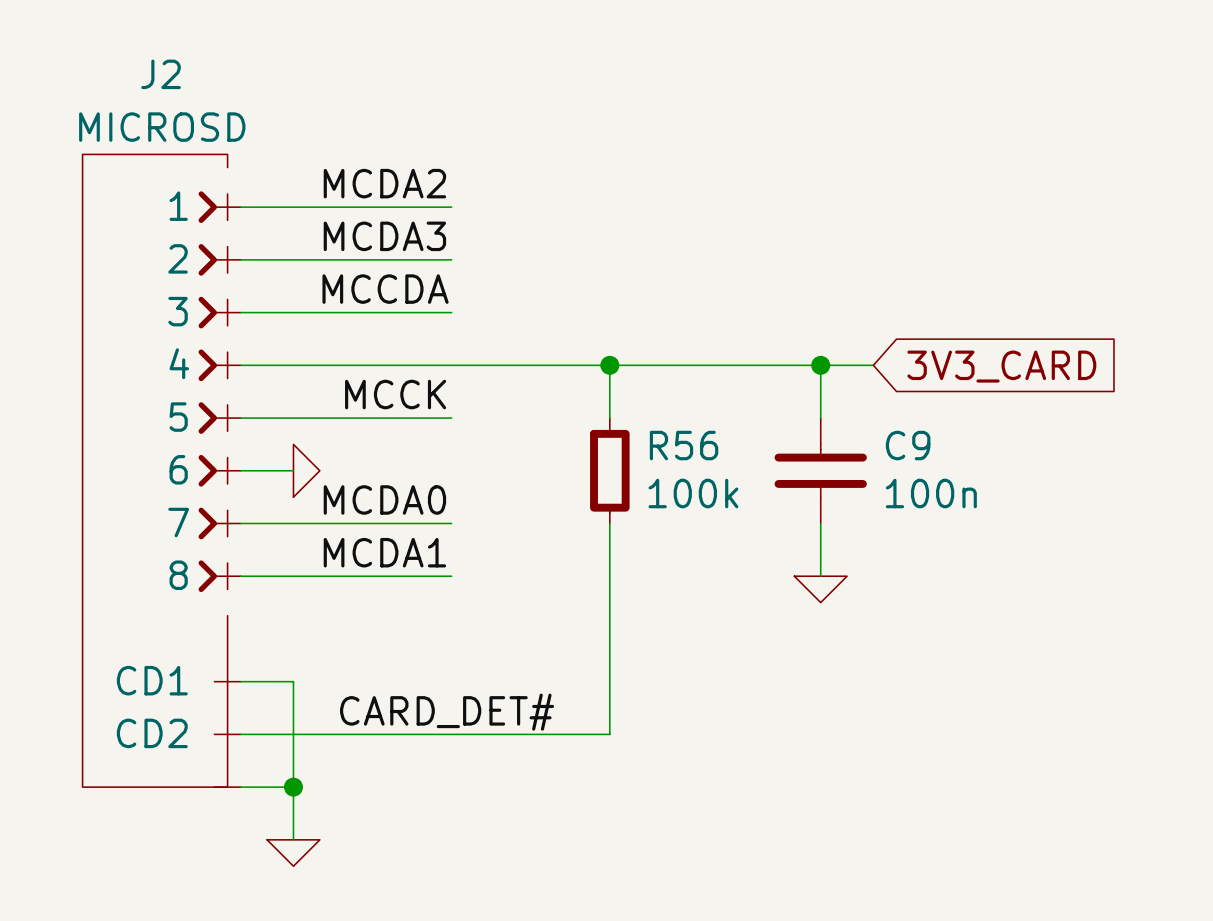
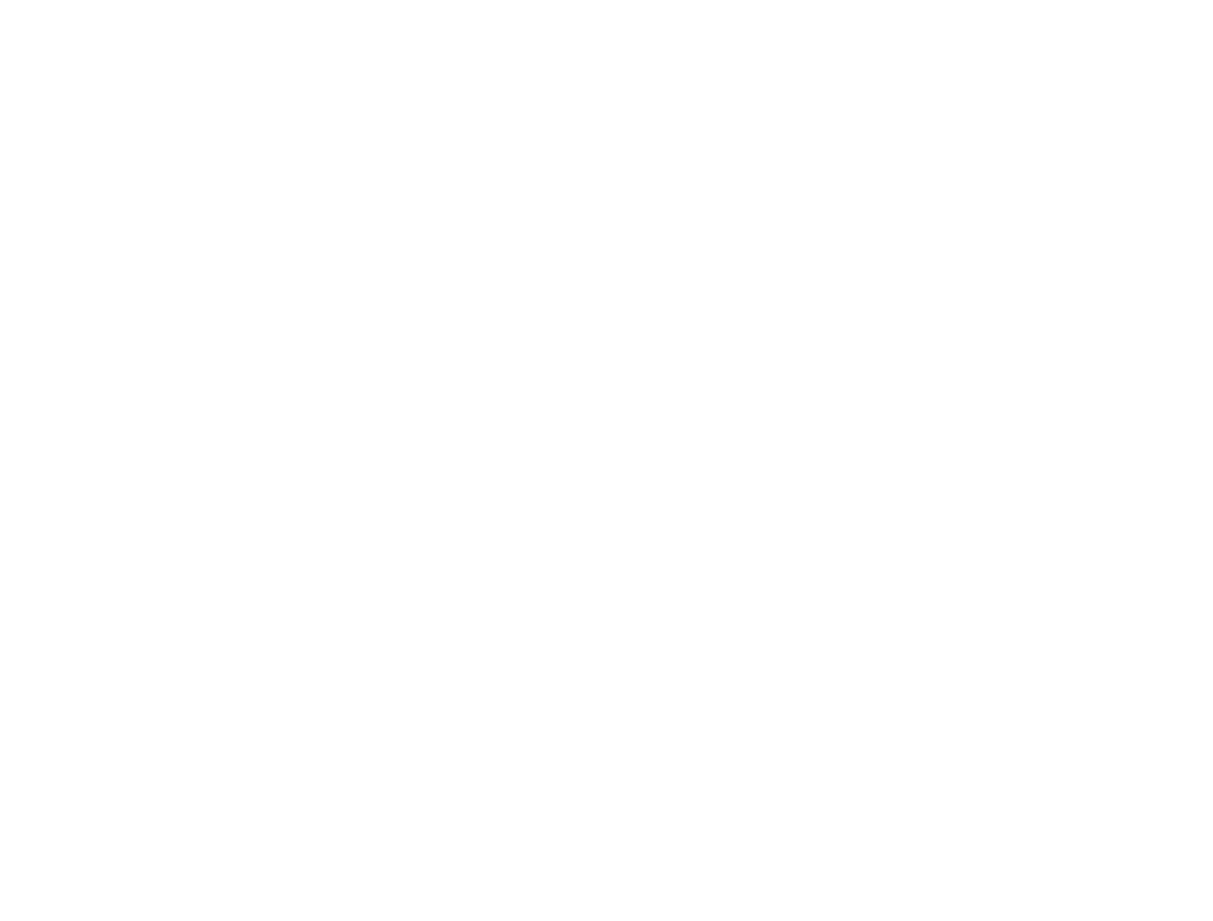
label: MCDA2 (384, 183) -> none
wire: (240, 207) (451, 207) -> none
label: MCDA3 (384, 236) -> none
wire: (240, 259) (451, 259) -> none
label: MCCDA (385, 289) -> none
wire: (240, 312) (451, 312) -> none
wire: (240, 365) (873, 365) -> none
wire: (609, 365) (609, 418) -> none
junction: (609, 365) -> none
wire: (820, 365) (820, 418) -> none
junction: (820, 365) -> none
global label: 3V3_CARD (1001, 366) -> none
label: MCCK (395, 394) -> none
wire: (240, 418) (451, 418) -> none
J2: MICROSD (161, 470) -> none
wire: (240, 470) (293, 470) -> none
power symbol: (306, 470) -> none
R56: 100k (609, 470) -> none
C9: 100n (820, 470) -> none
label: MCDA0 (384, 499) -> none
wire: (240, 523) (451, 523) -> none
wire: (609, 523) (609, 734) (240, 734) -> none
wire: (820, 523) (820, 576) -> none
label: MCDA1 (384, 552) -> none
wire: (240, 576) (451, 576) -> none
power symbol: (820, 589) -> none
wire: (240, 681) (293, 681) (293, 839) -> none
label: CARD_DET# (447, 712) -> none
wire: (240, 787) (293, 787) -> none
junction: (293, 787) -> none
power symbol: (293, 853) -> none

